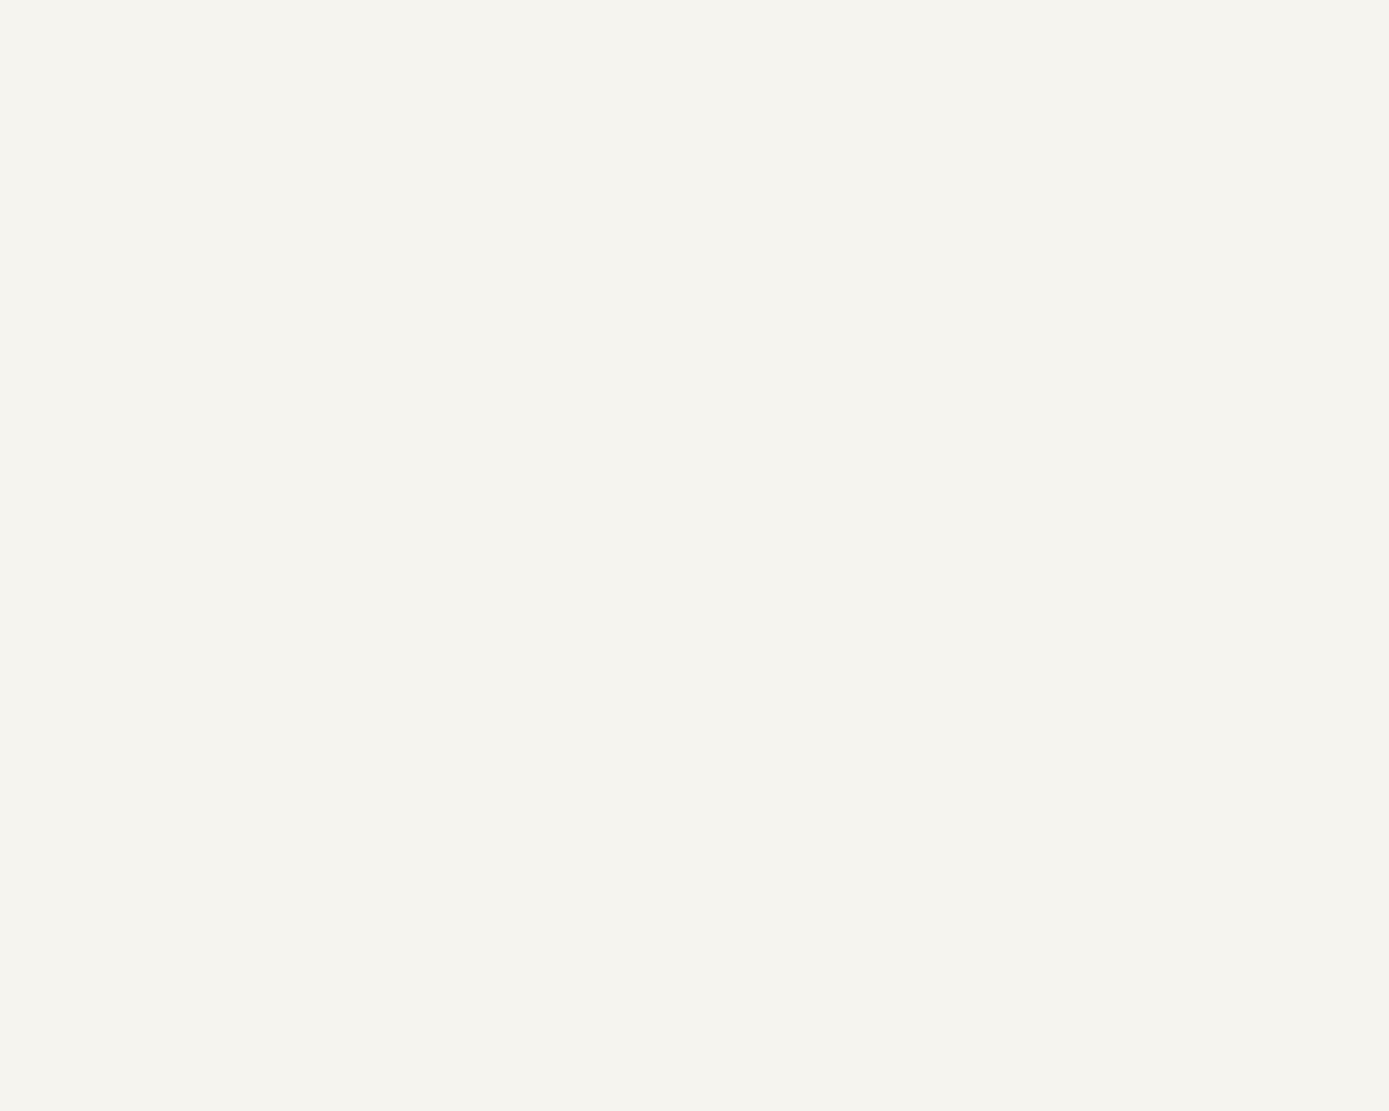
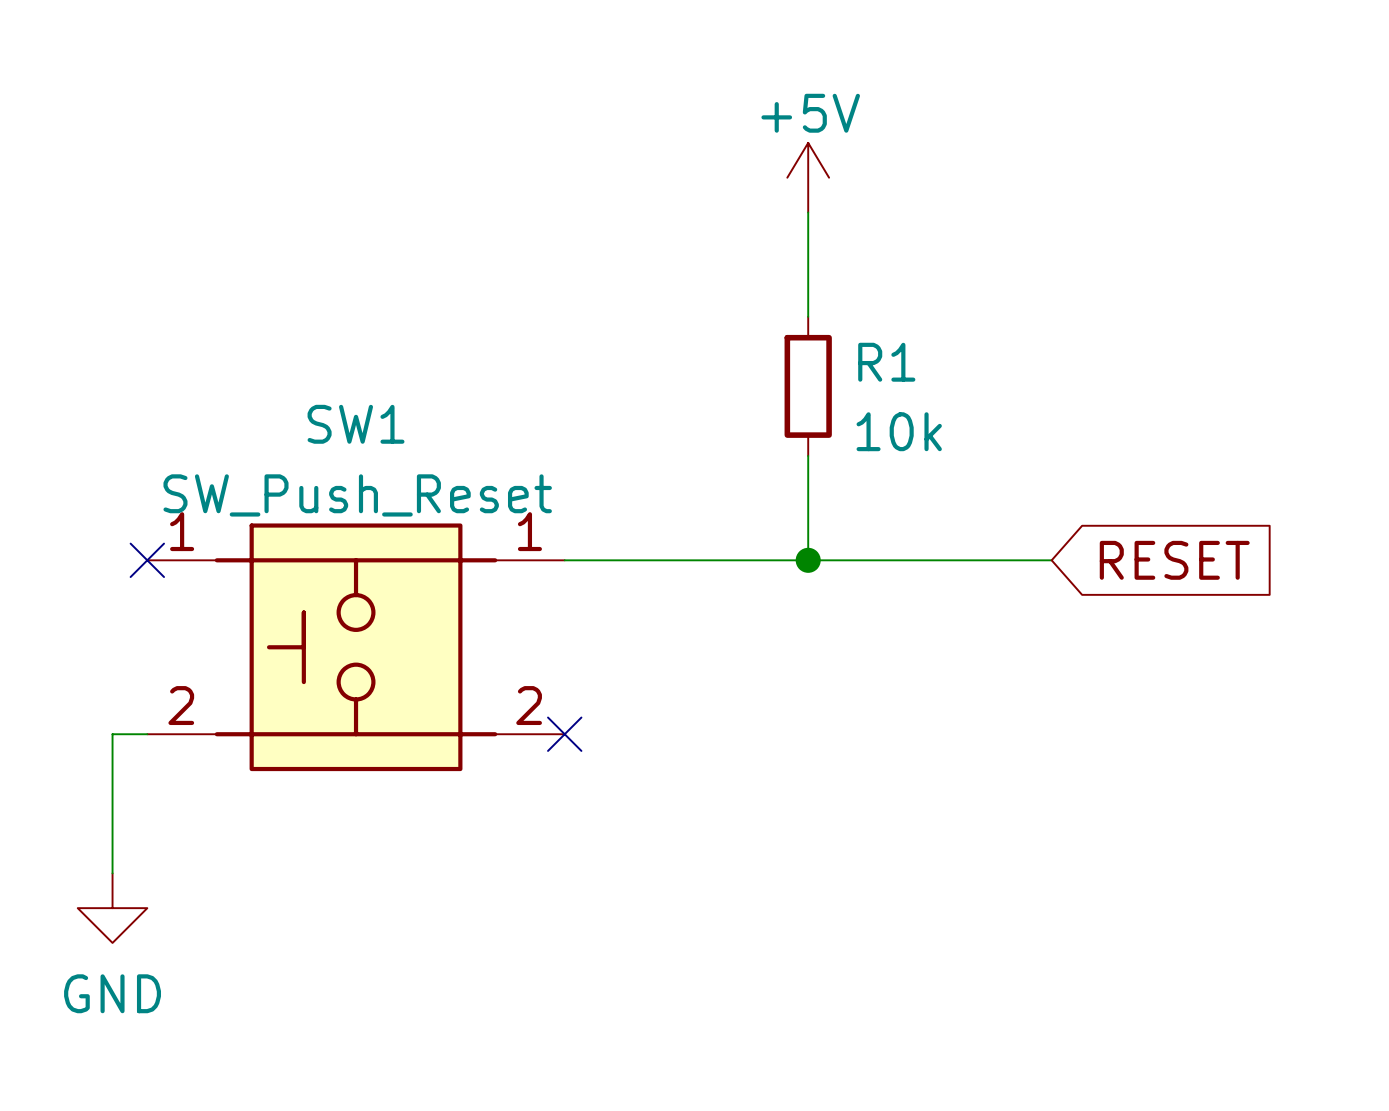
power symbol: none -> +5V (808, 177)
wire: none -> (808, 212) (808, 316)
R1: none -> 10k (808, 386)
wire: none -> (808, 455) (808, 560)
no-connect mark: none -> (147, 560)
wire: none -> (564, 560) (1051, 560)
junction: none -> (808, 560)
global label: none -> RESET (1174, 560)
SW1: none -> SW_Push_Reset (356, 647)
wire: none -> (147, 734) (112, 734) (112, 873)
no-connect mark: none -> (564, 734)
power symbol: none -> GND (112, 908)

